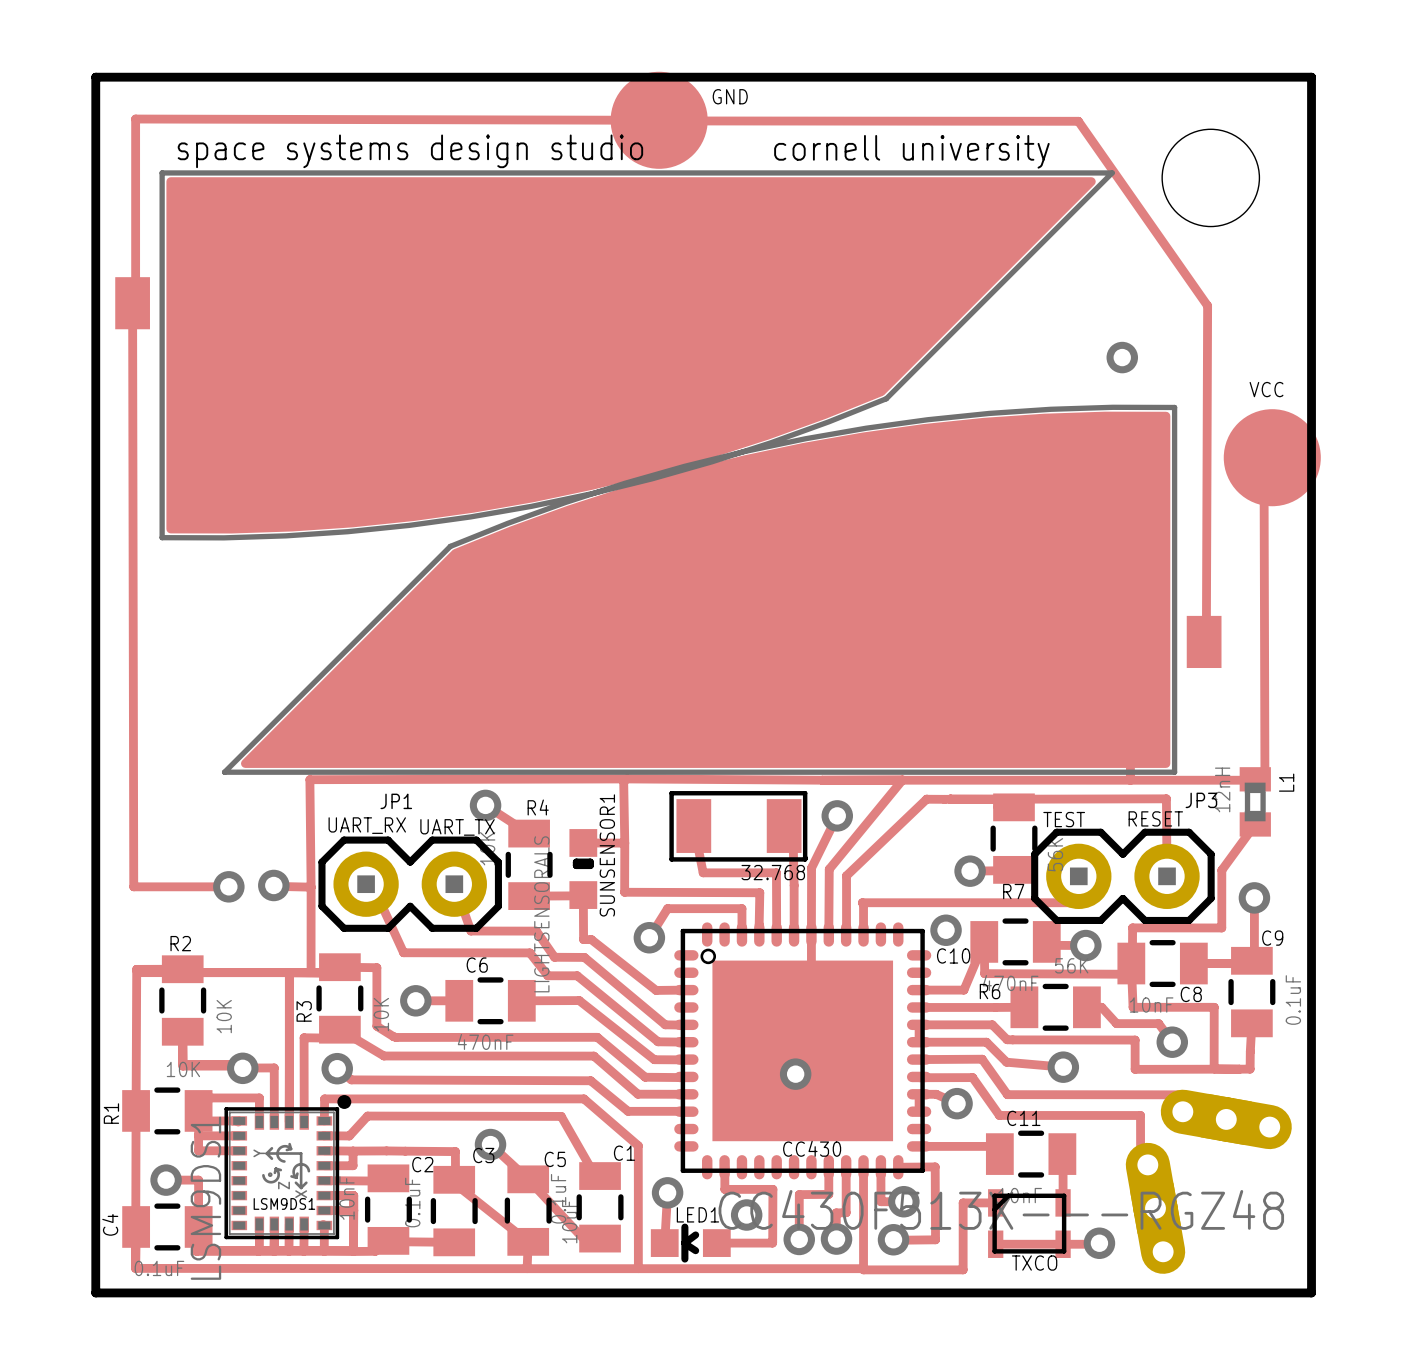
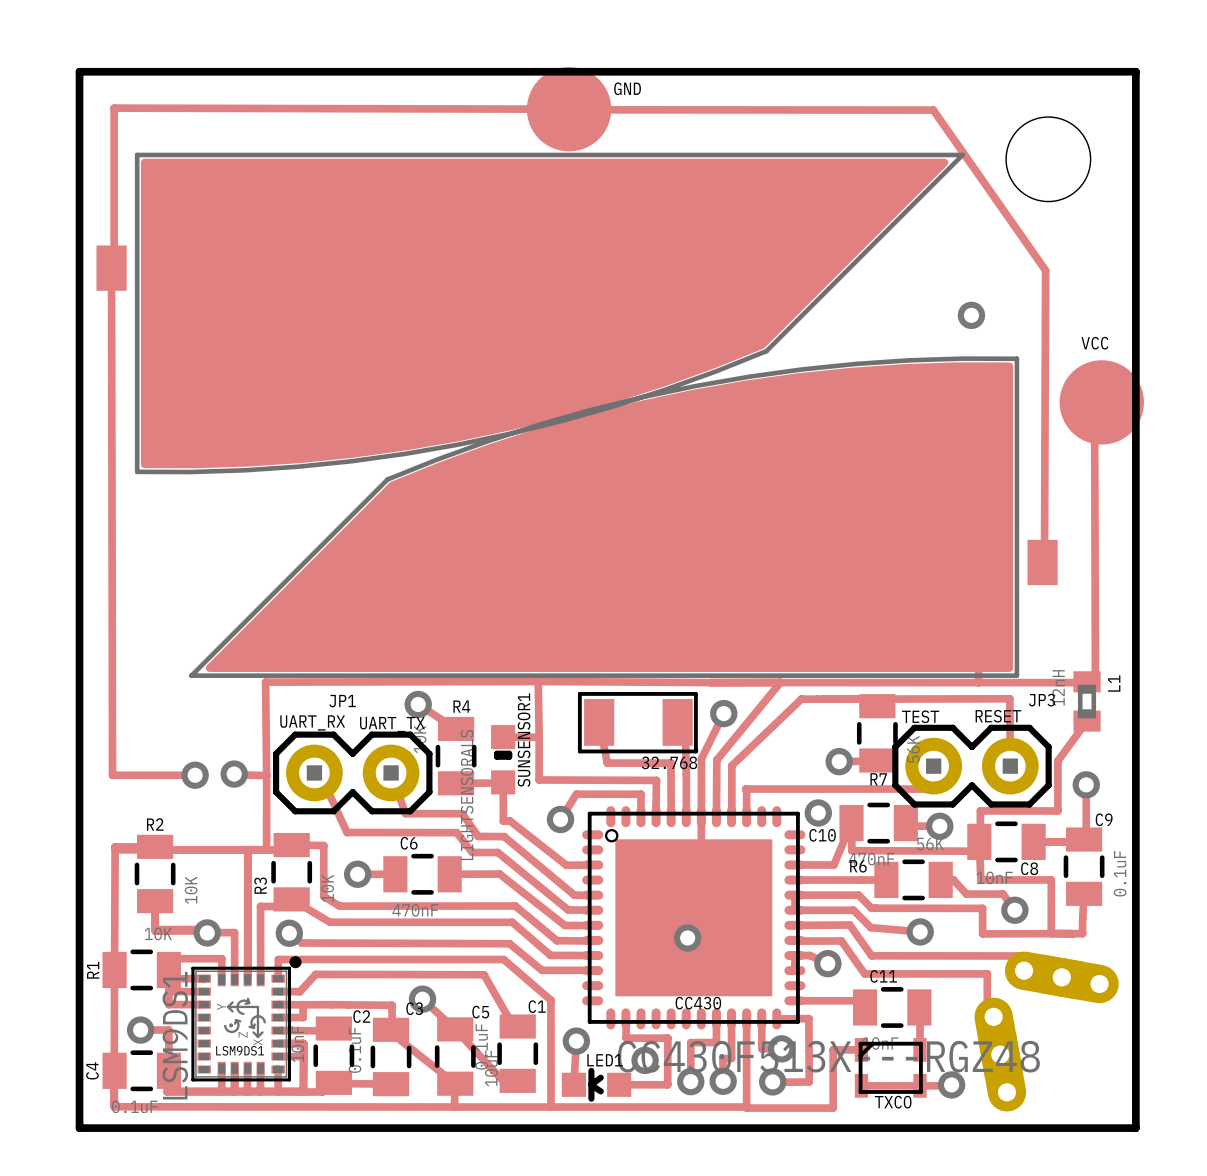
text: space systems design studio (410, 151) -> none
text: cornell university (911, 151) -> none

